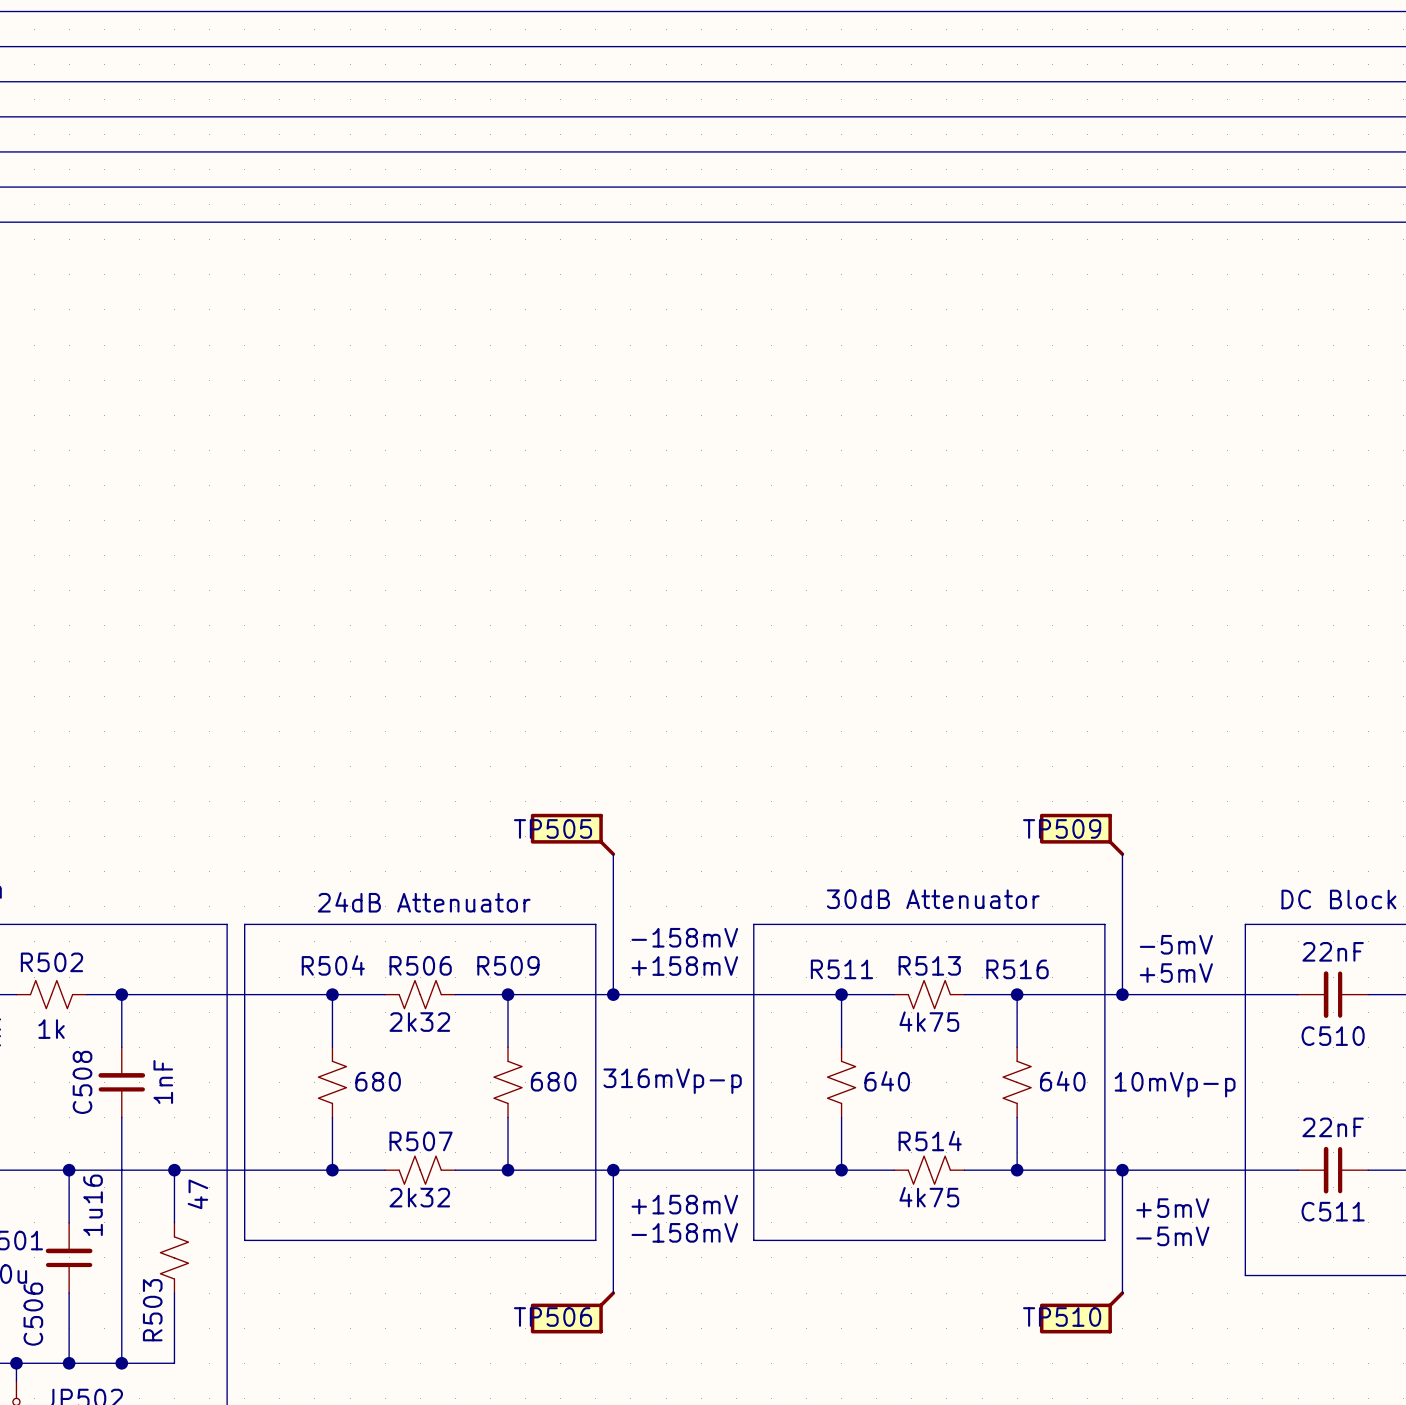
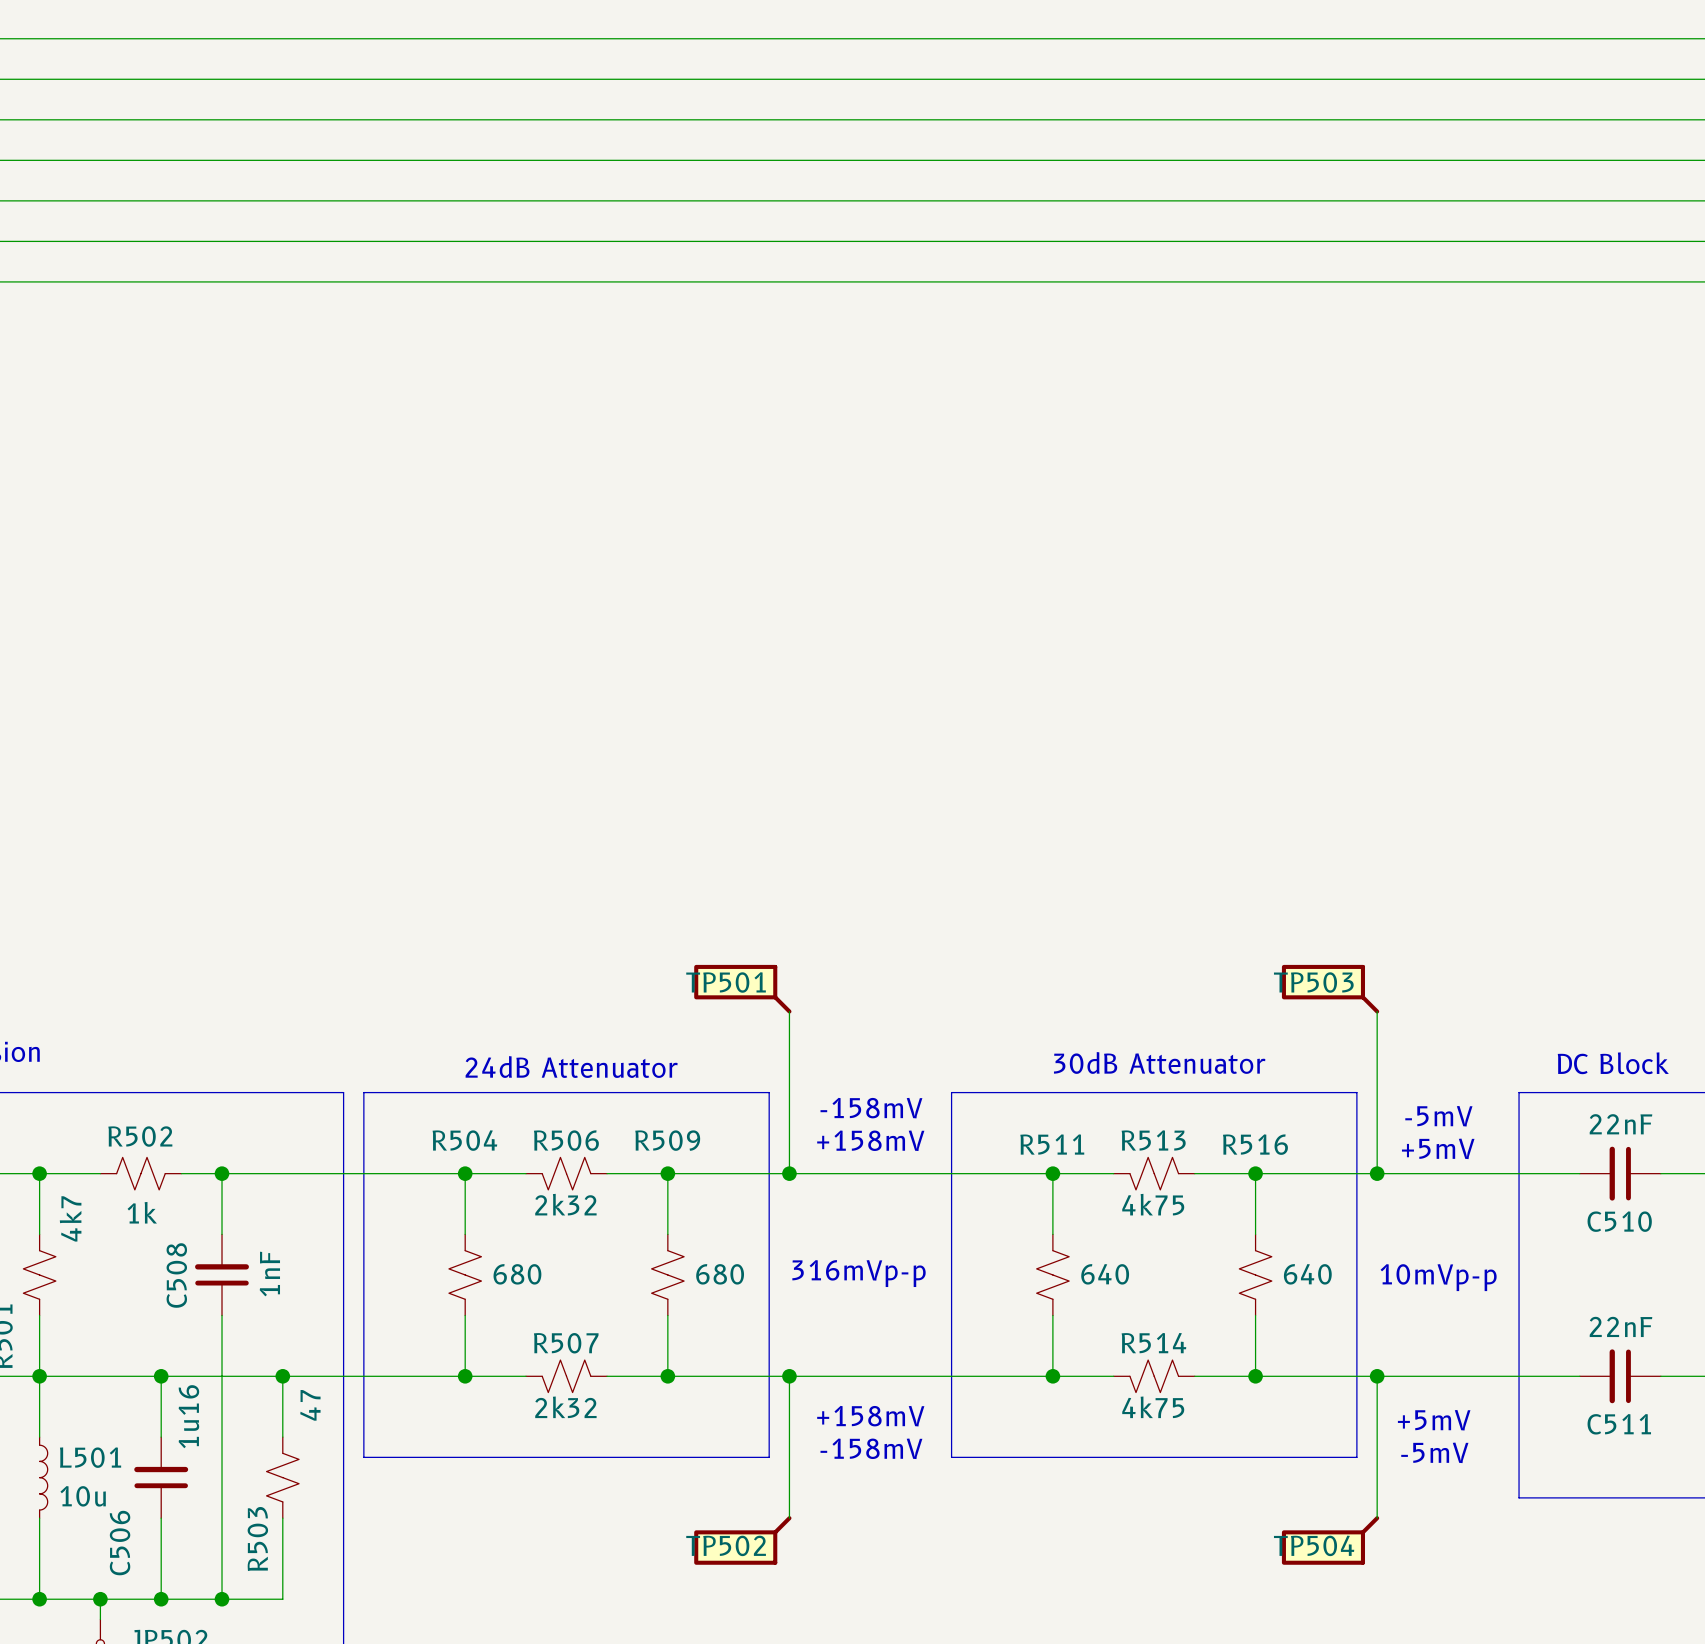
TP505 name: TP505 (553, 828) -> TP501 (726, 982)
TP509 name: TP509 (1062, 828) -> TP503 (1313, 982)
TP506 name: TP506 (553, 1316) -> TP502 (726, 1545)
TP510 name: TP510 (1062, 1316) -> TP504 (1314, 1545)

